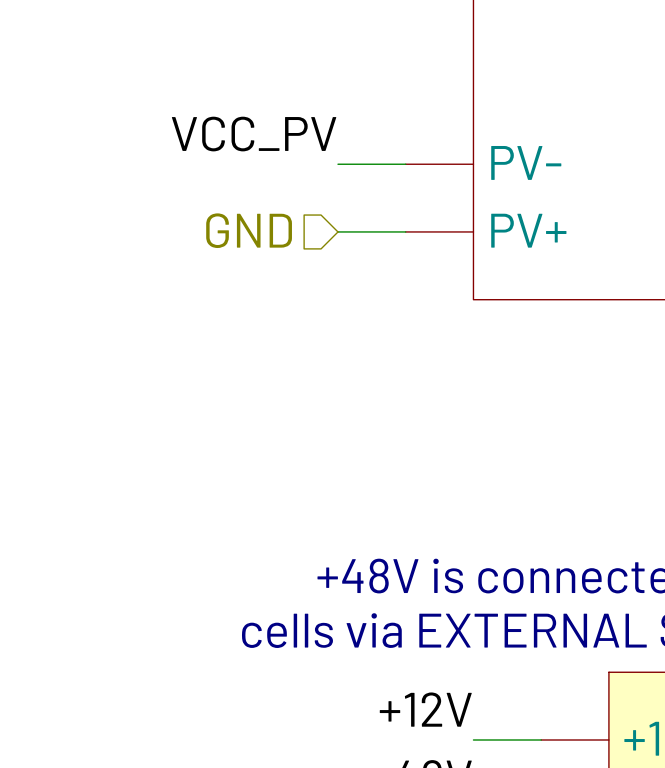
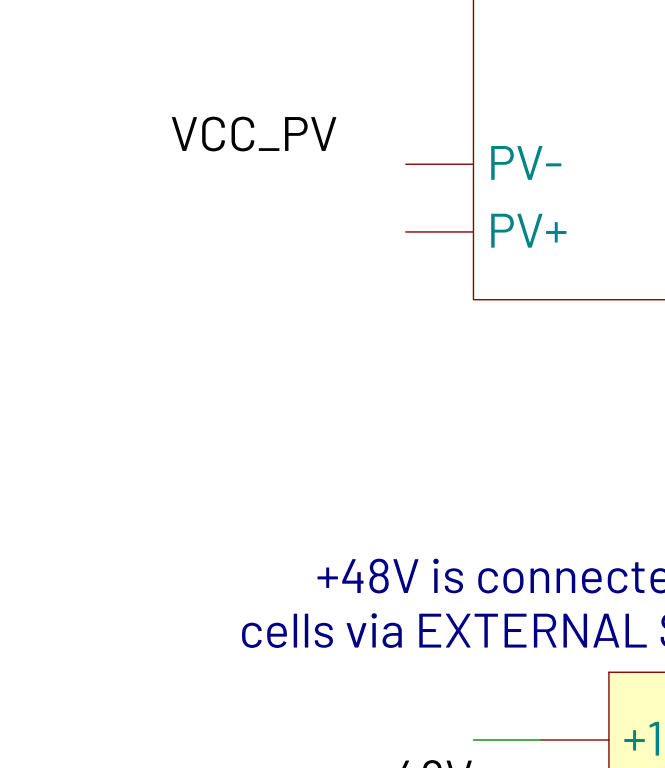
wire: (337, 164) (405, 164) -> none
hierarchical label: GND (249, 230) -> none
wire: (337, 231) (405, 231) -> none
label: +12V (425, 709) -> none

